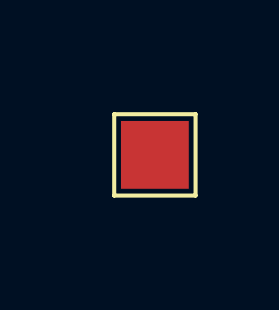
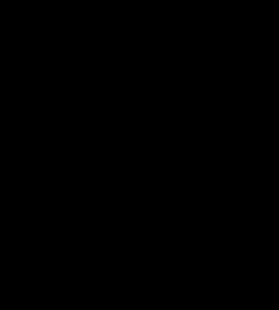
part: (154, 154) -> none

